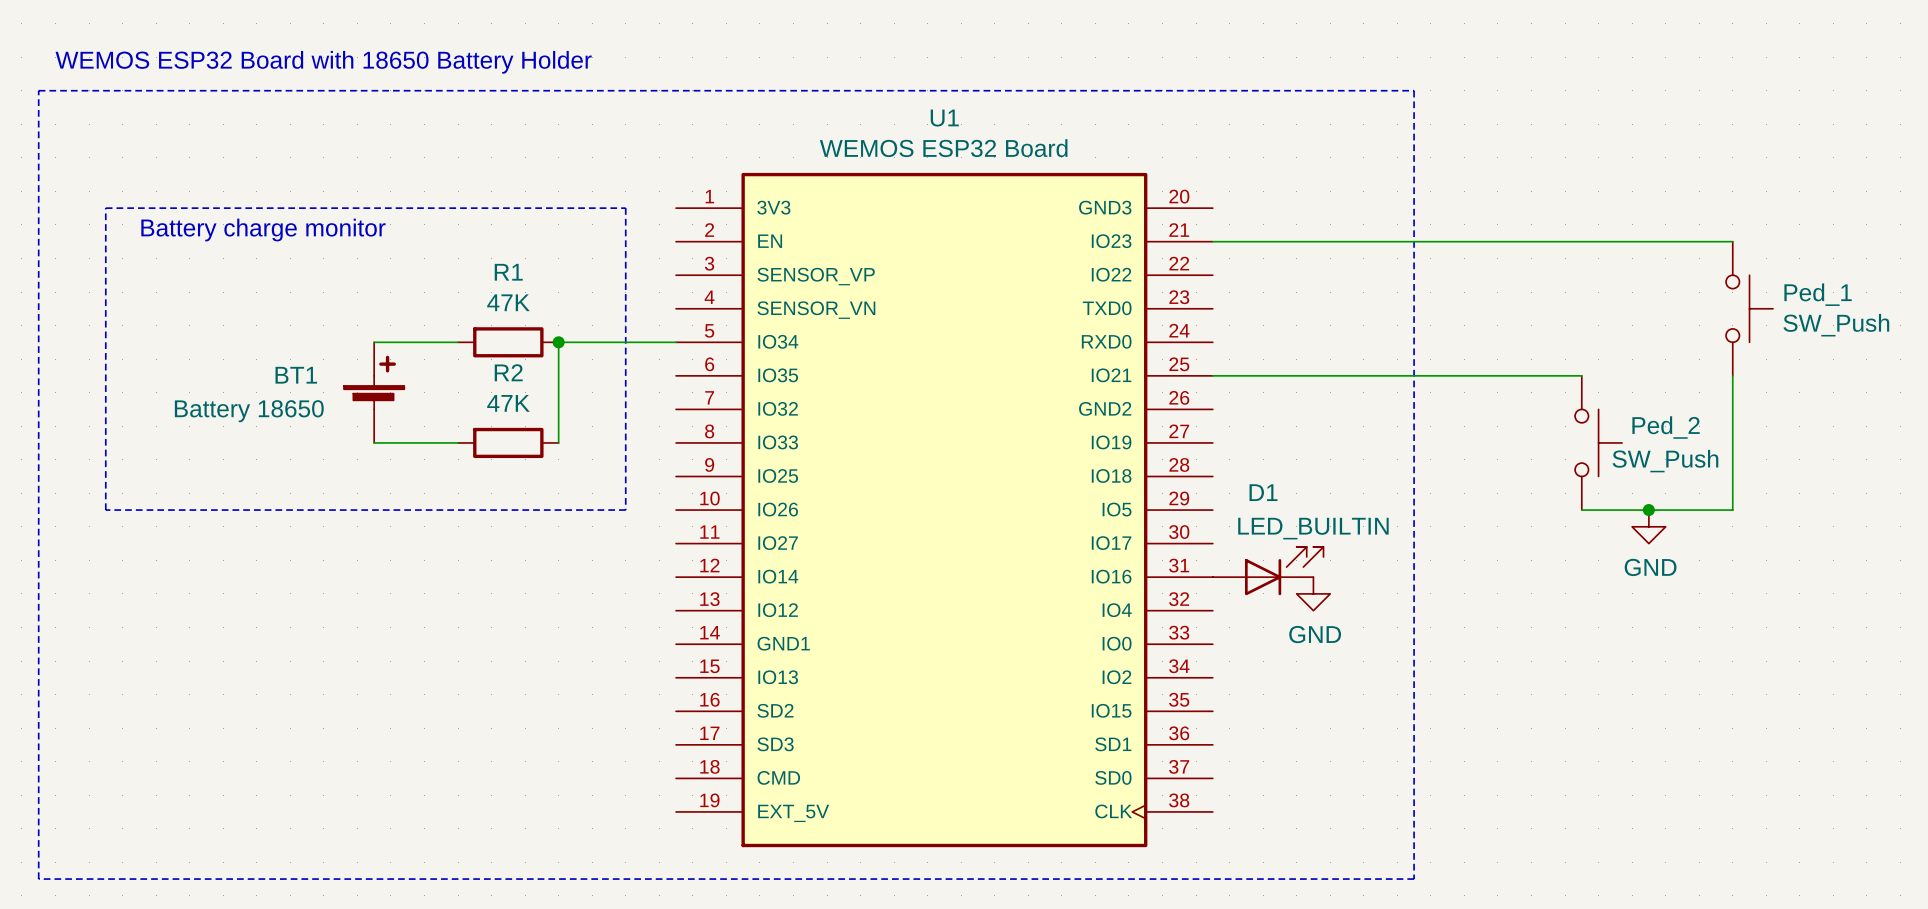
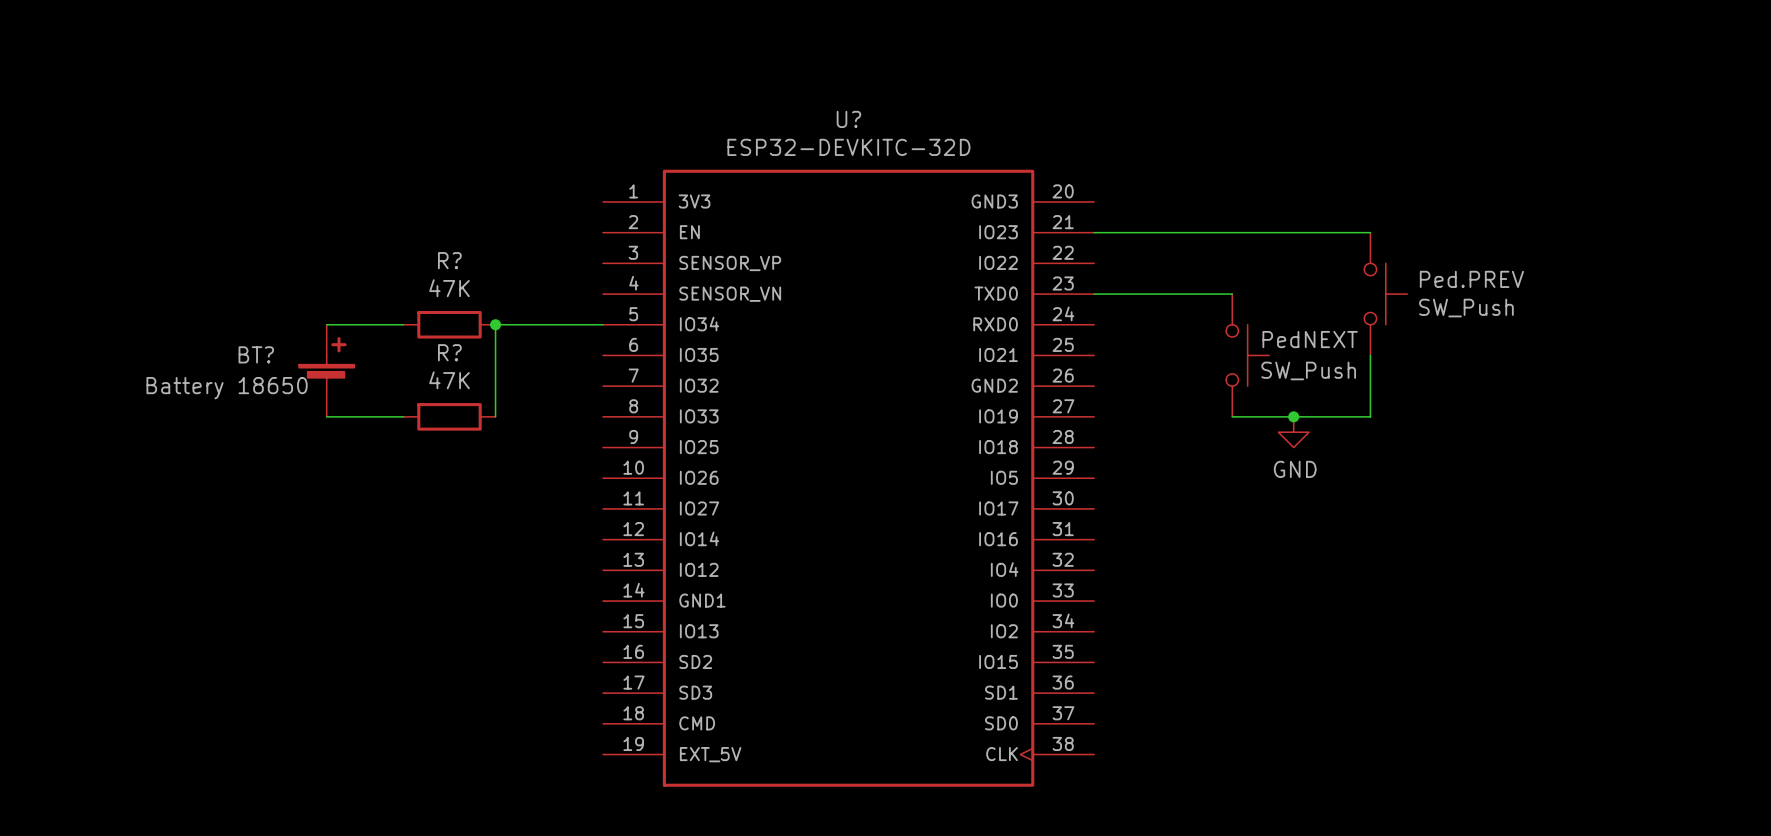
text: WEMOS ESP32 Board with 18650 Battery Holder (323, 62) -> none
line: (38, 90) (1414, 90) (1414, 879) (38, 879) (38, 90) -> none
U1 name: U1 (944, 118) -> U? (848, 119)
U1 value: WEMOS ESP32 Board (943, 148) -> ESP32-DEVKITC-32D (848, 147)
line: (105, 208) (105, 510) (625, 510) (625, 208) (105, 208) -> none
text: Battery charge monitor (263, 230) -> none
wire: (1514, 241) (1732, 241) -> none
R1 name: R1 (508, 272) -> R? (449, 260)
wire: none -> (1094, 294) (1232, 294)
Ped.PREV: none -> SW_Push (1385, 294)
Ped_1: SW_Push (1749, 308) -> none
R2 name: R2 (508, 372) -> R? (449, 352)
BT1 name: BT1 (296, 375) -> BT? (256, 354)
wire: (1212, 375) (1581, 375) -> none
PedNEXT: none -> SW_Push (1247, 355)
wire: none -> (1370, 355) (1370, 416) (1232, 416)
wire: (1732, 375) (1732, 510) (1581, 510) -> none
junction: none -> (1293, 416)
Ped_2: SW_Push (1598, 442) -> none
power symbol: none -> GND (1293, 432)
junction: (1648, 510) -> none
power symbol: GND (1648, 526) -> none
D1: LED_BUILTIN (1268, 571) -> none
power symbol: GND (1313, 593) -> none

